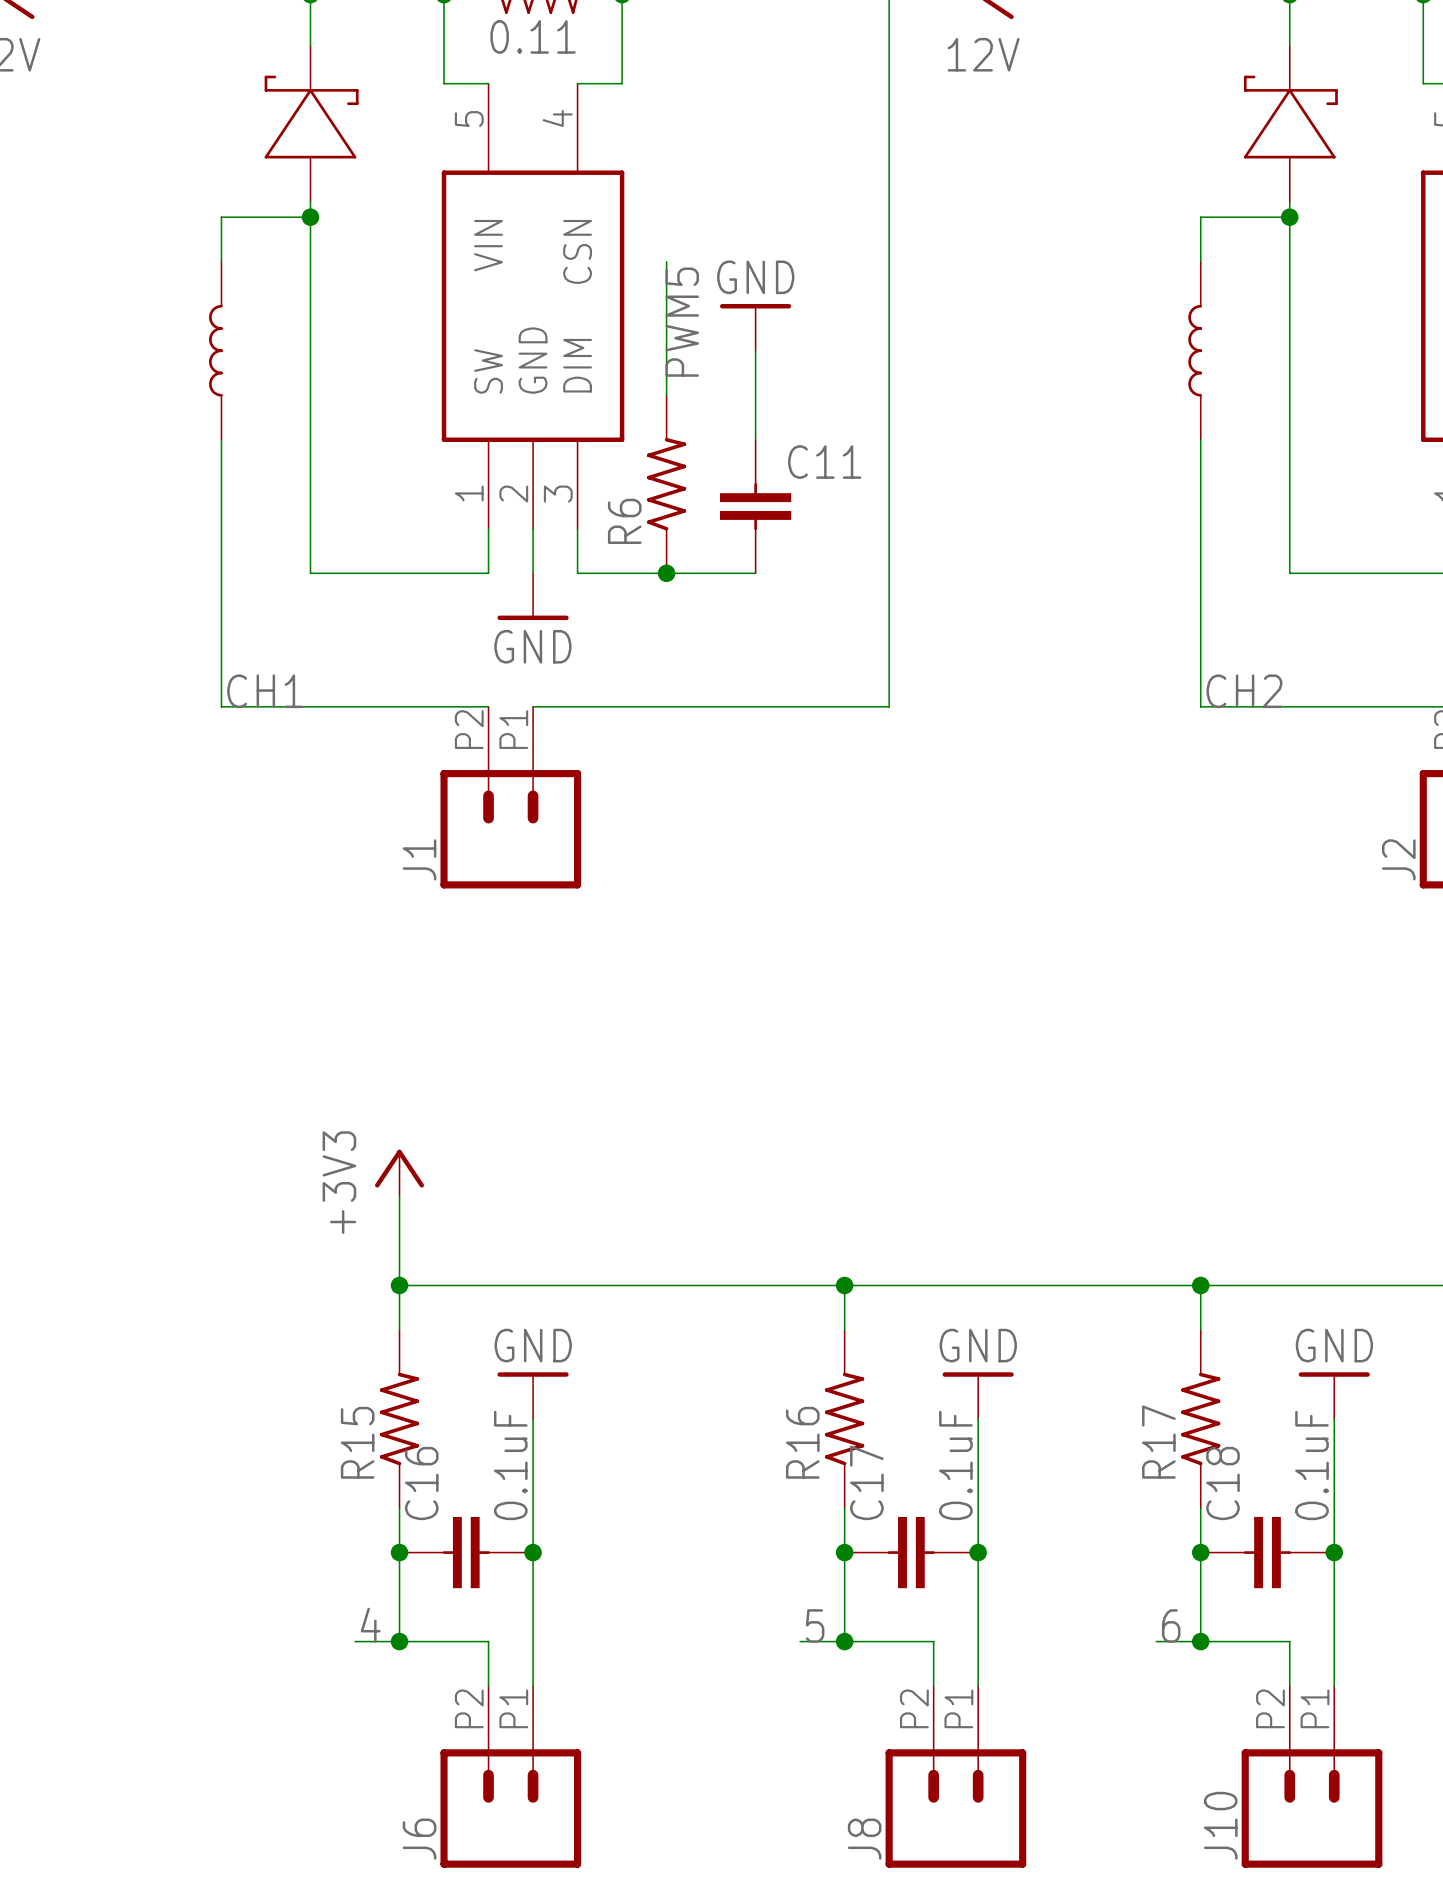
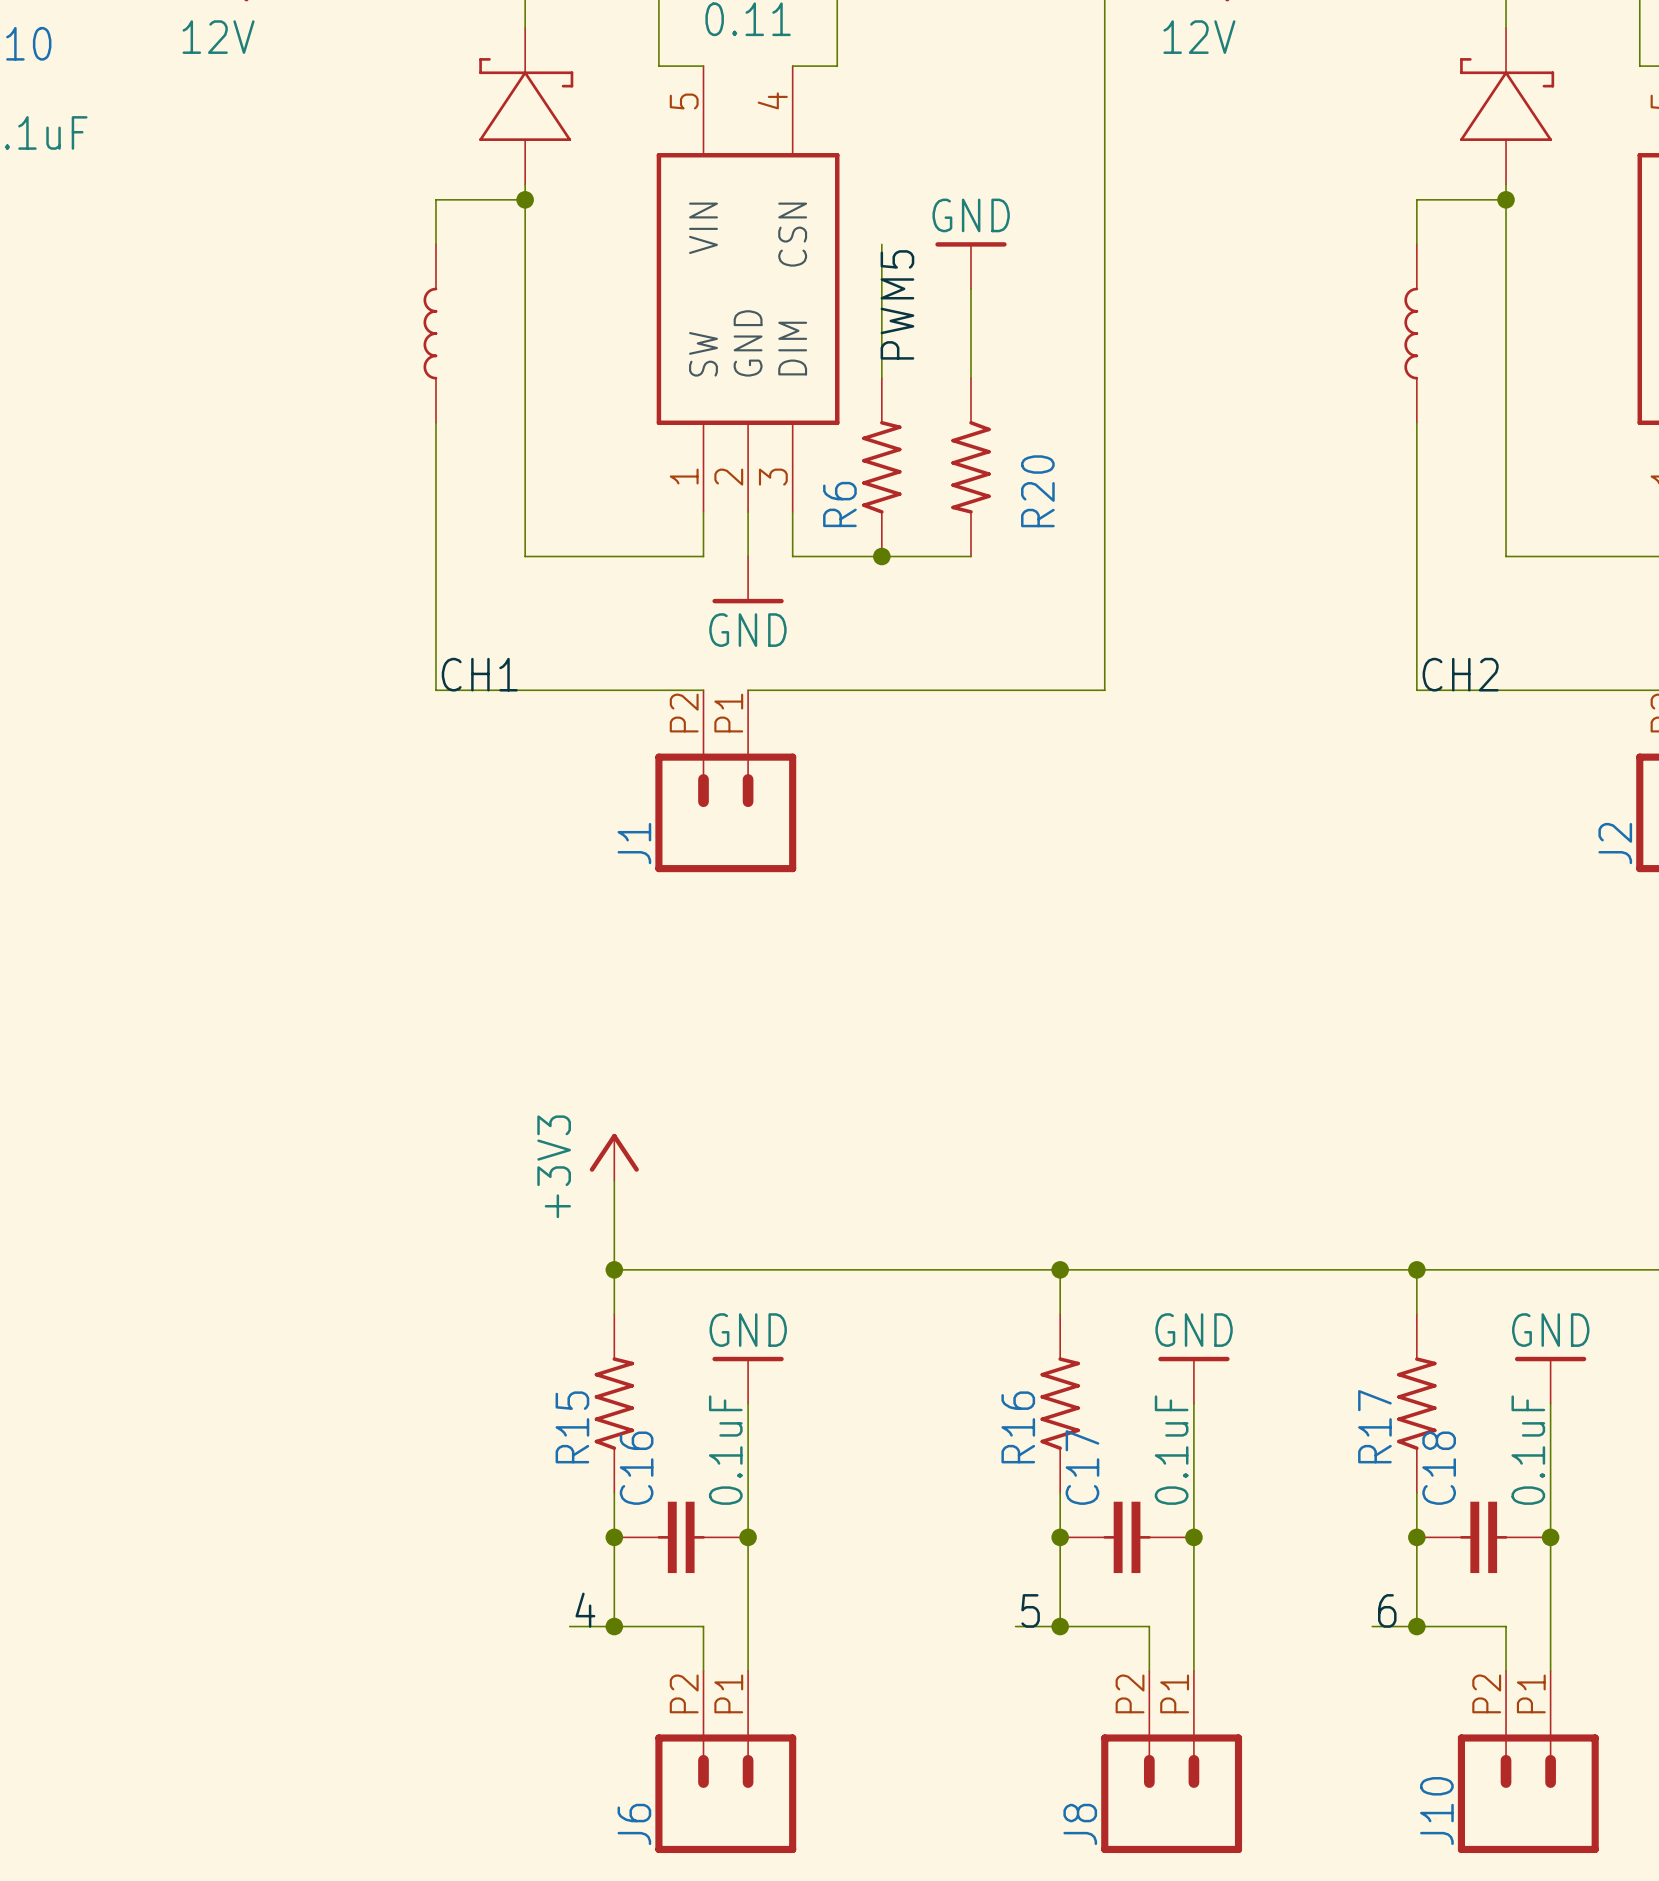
power symbol position: GND (755, 327) -> GND (971, 265)
R20: none -> (971, 467)
C11: (755, 506) -> none

